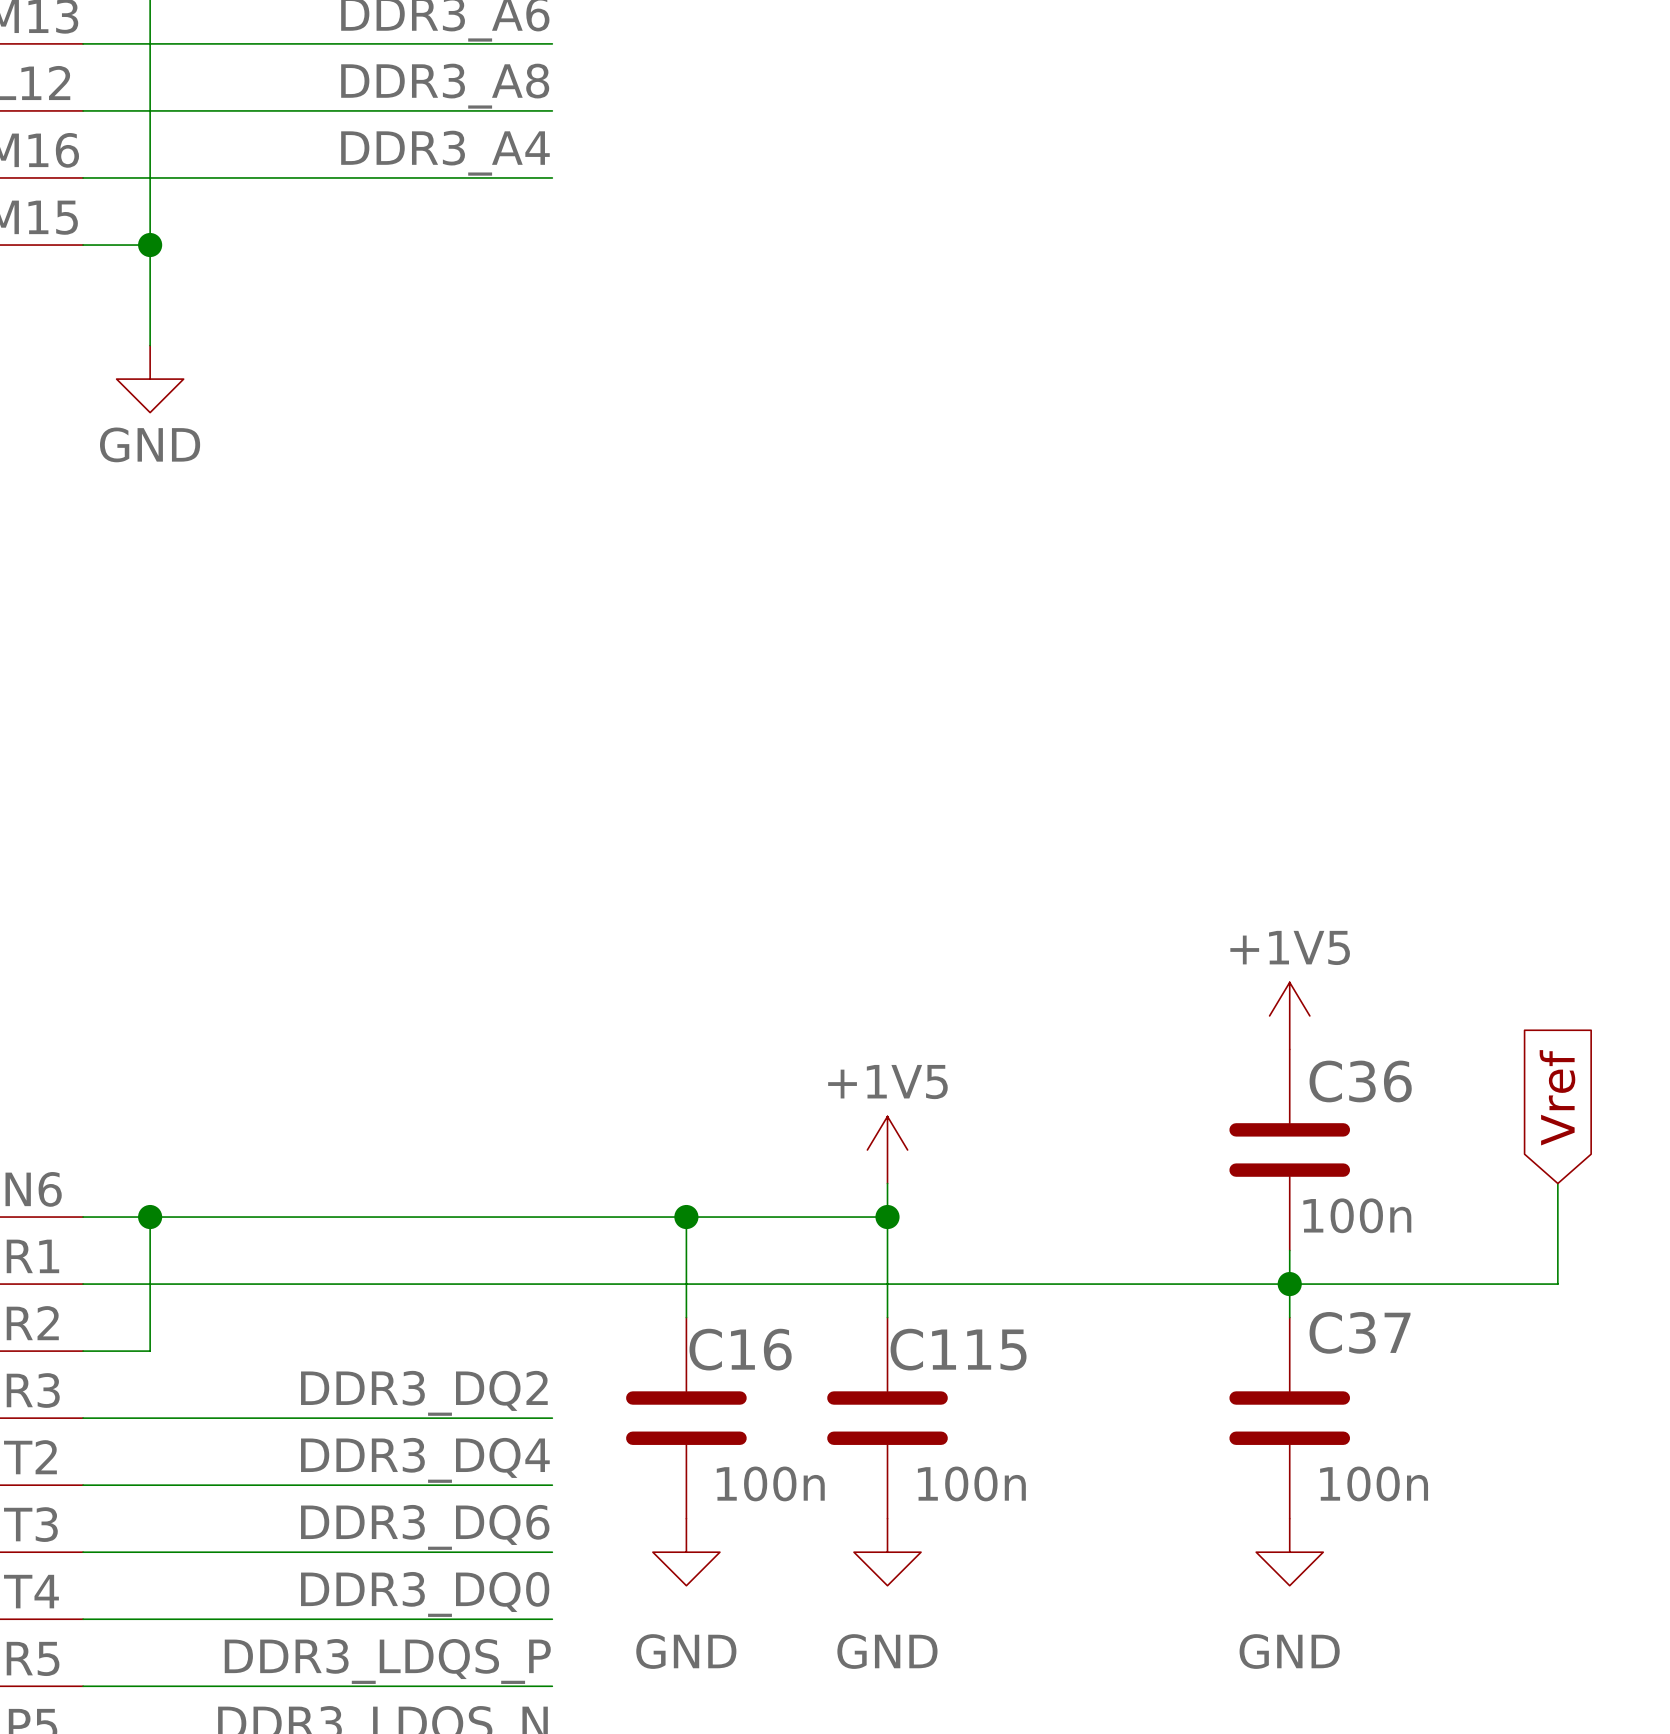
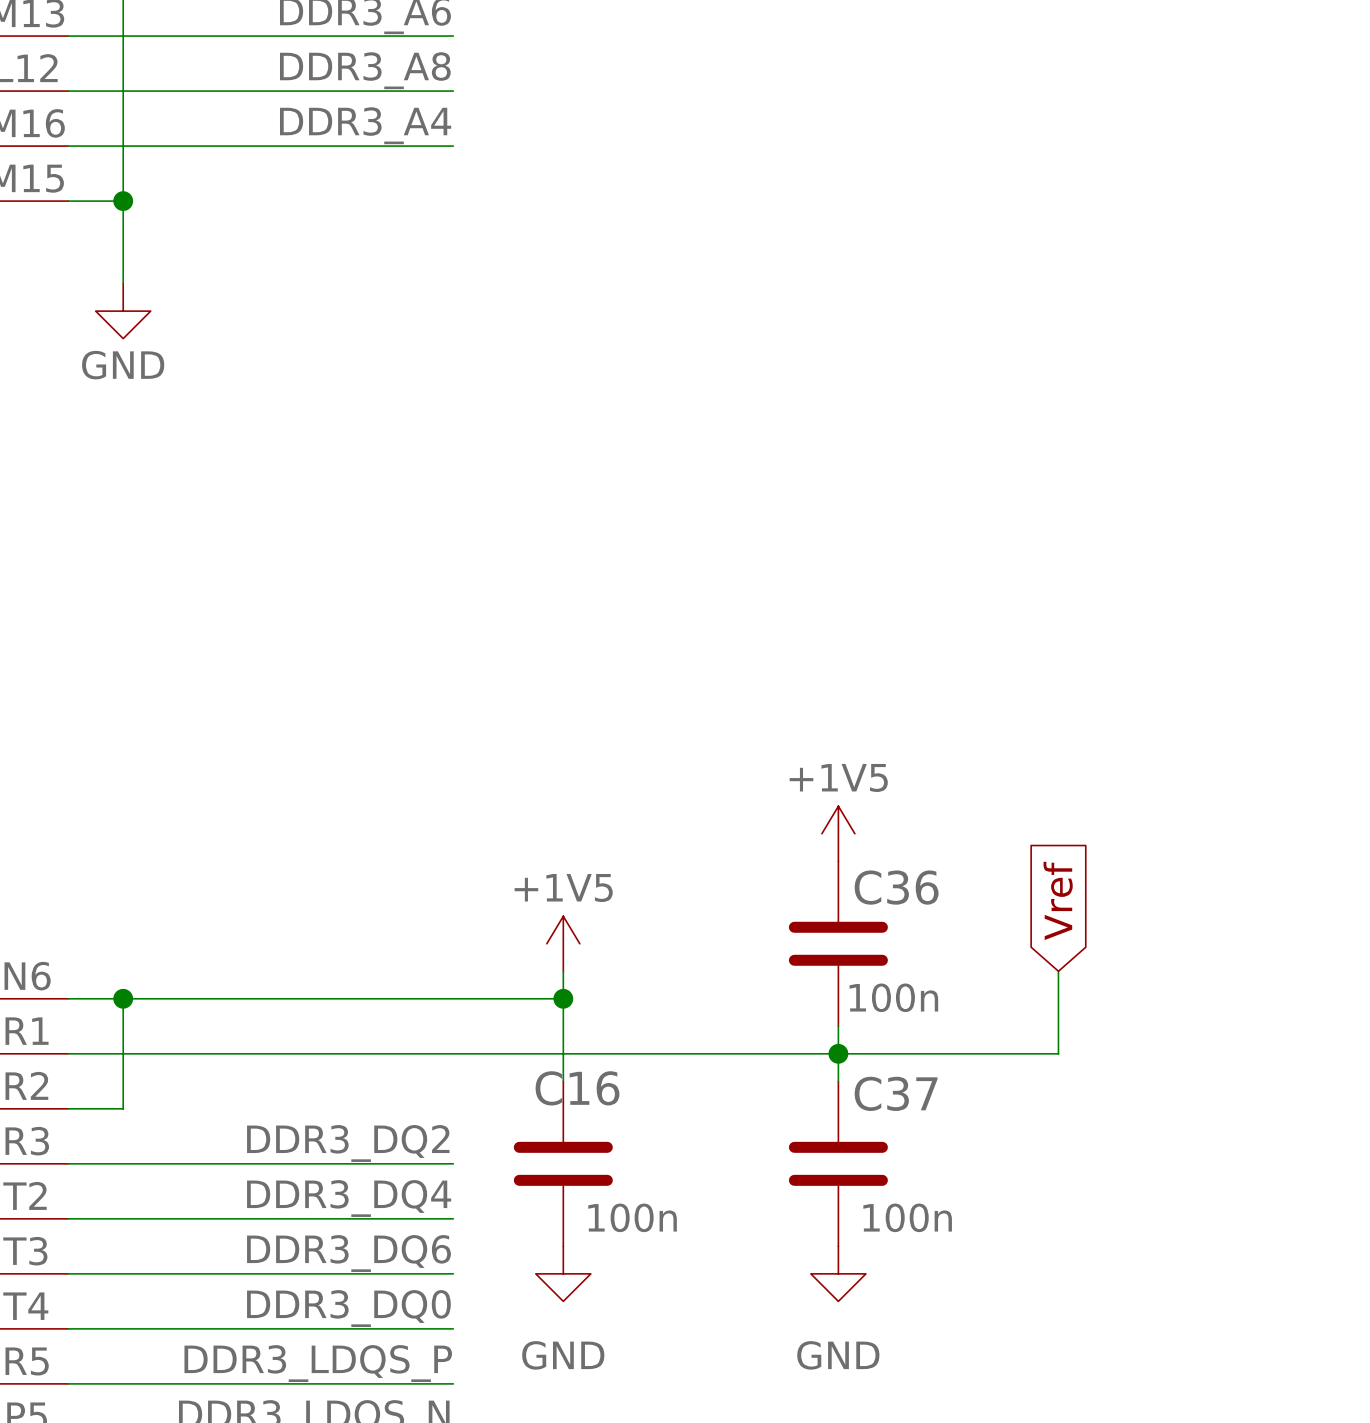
power symbol: none -> +1V5 (838, 833)
power symbol: +1V5 (1289, 1015) -> none
global label position: Vref (1557, 1097) -> Vref (1058, 900)
power symbol: none -> +1V5 (563, 943)
power symbol: +1V5 (887, 1149) -> none
C36 position: (1289, 1149) -> (838, 943)
wire: (887, 1183) (887, 1317) -> none
wire: (1557, 1183) (1557, 1284) (1289, 1284) (1289, 1317) -> none
wire: (686, 1217) (887, 1217) -> (563, 998) (563, 971)
junction: (887, 1217) -> none
wire: none -> (838, 1026) (838, 1081)
junction: none -> (838, 1053)
junction: (1289, 1284) -> none
C16 name position: C16 (740, 1349) -> C16 (577, 1088)
C115: (887, 1418) -> none
C37 position: (1289, 1418) -> (838, 1163)
power symbol: GND (887, 1552) -> none
power symbol: none -> GND (838, 1273)
power symbol: GND (1289, 1552) -> none

